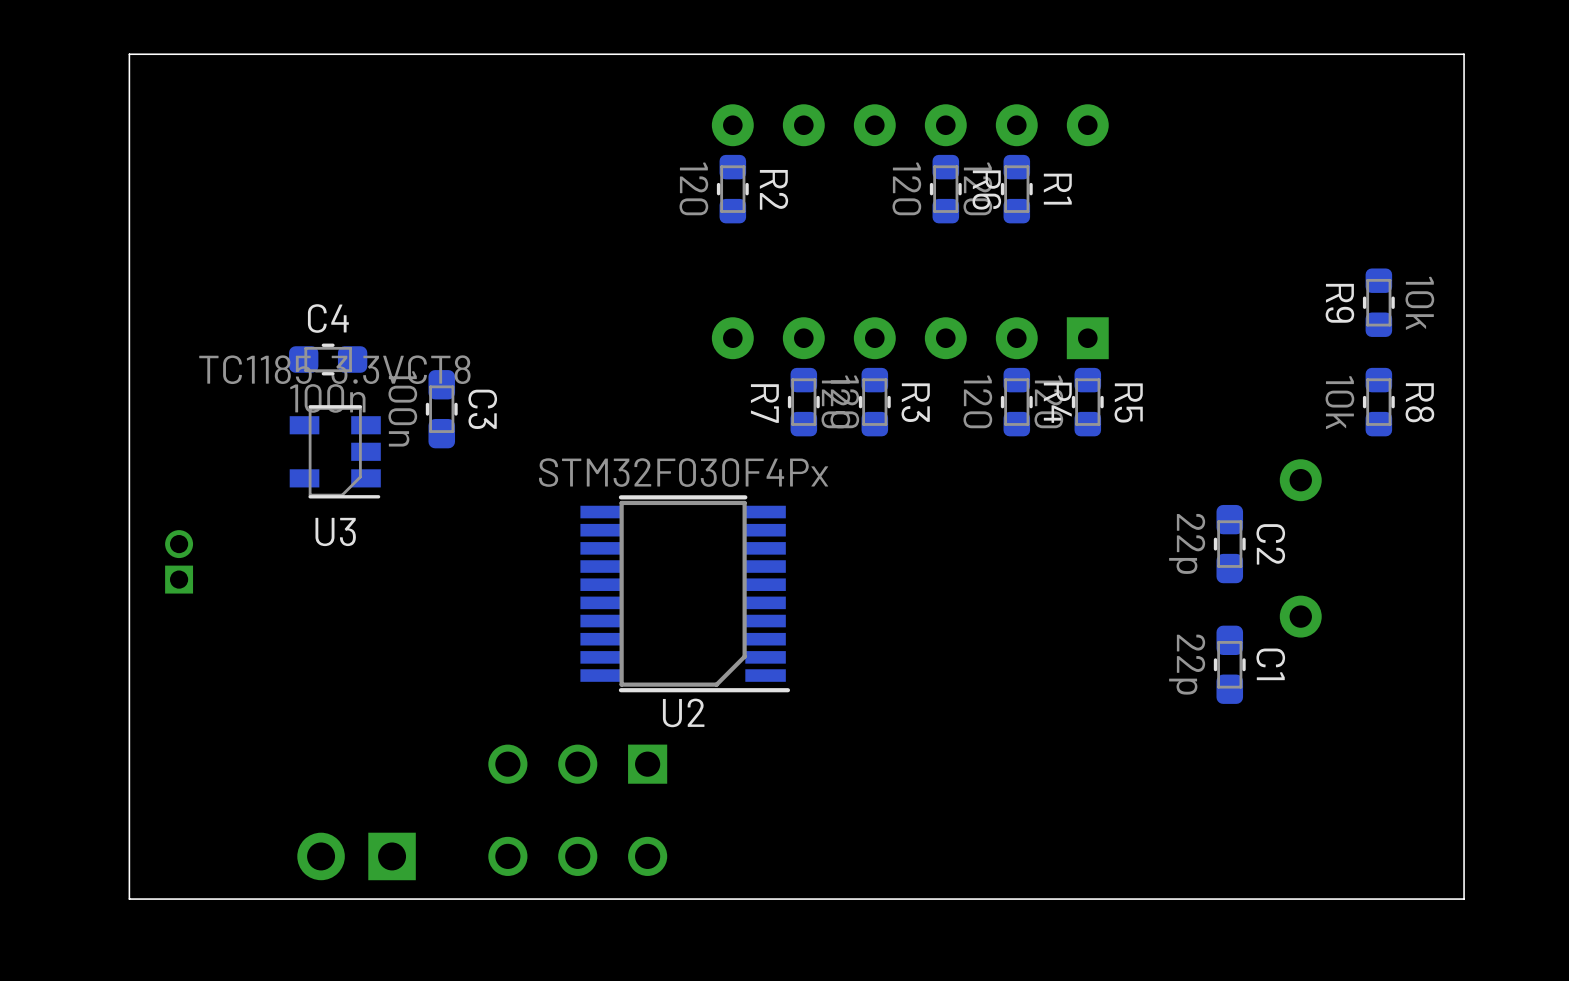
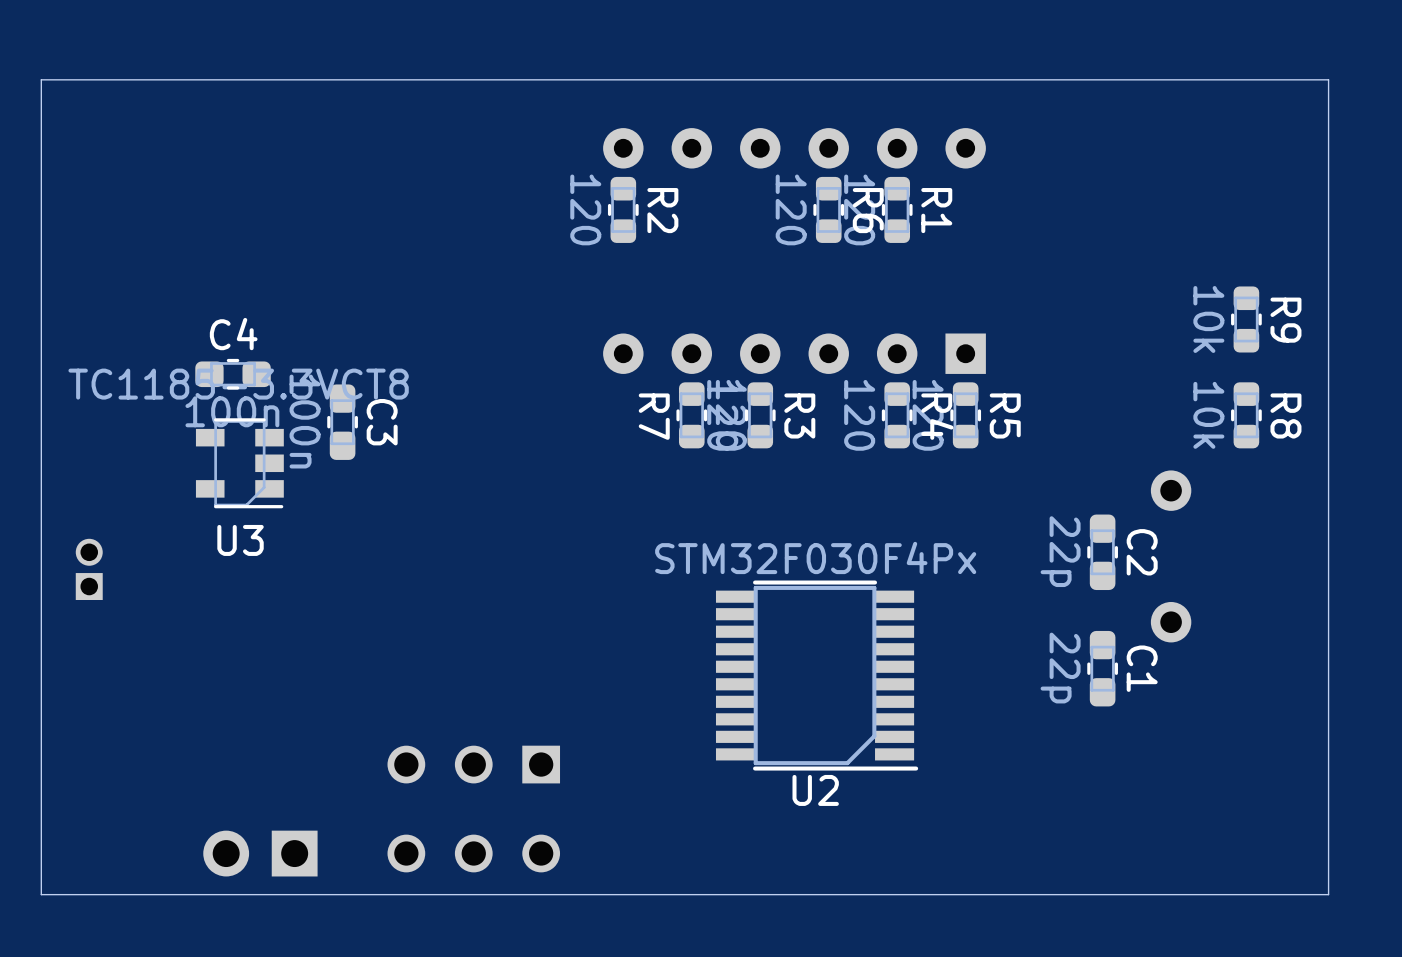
R9 name position: R9 (1339, 303) -> R9 (1285, 320)
R9 value position: 10k (1419, 303) -> 10k (1208, 319)
U2 position: (685, 593) -> (817, 675)

